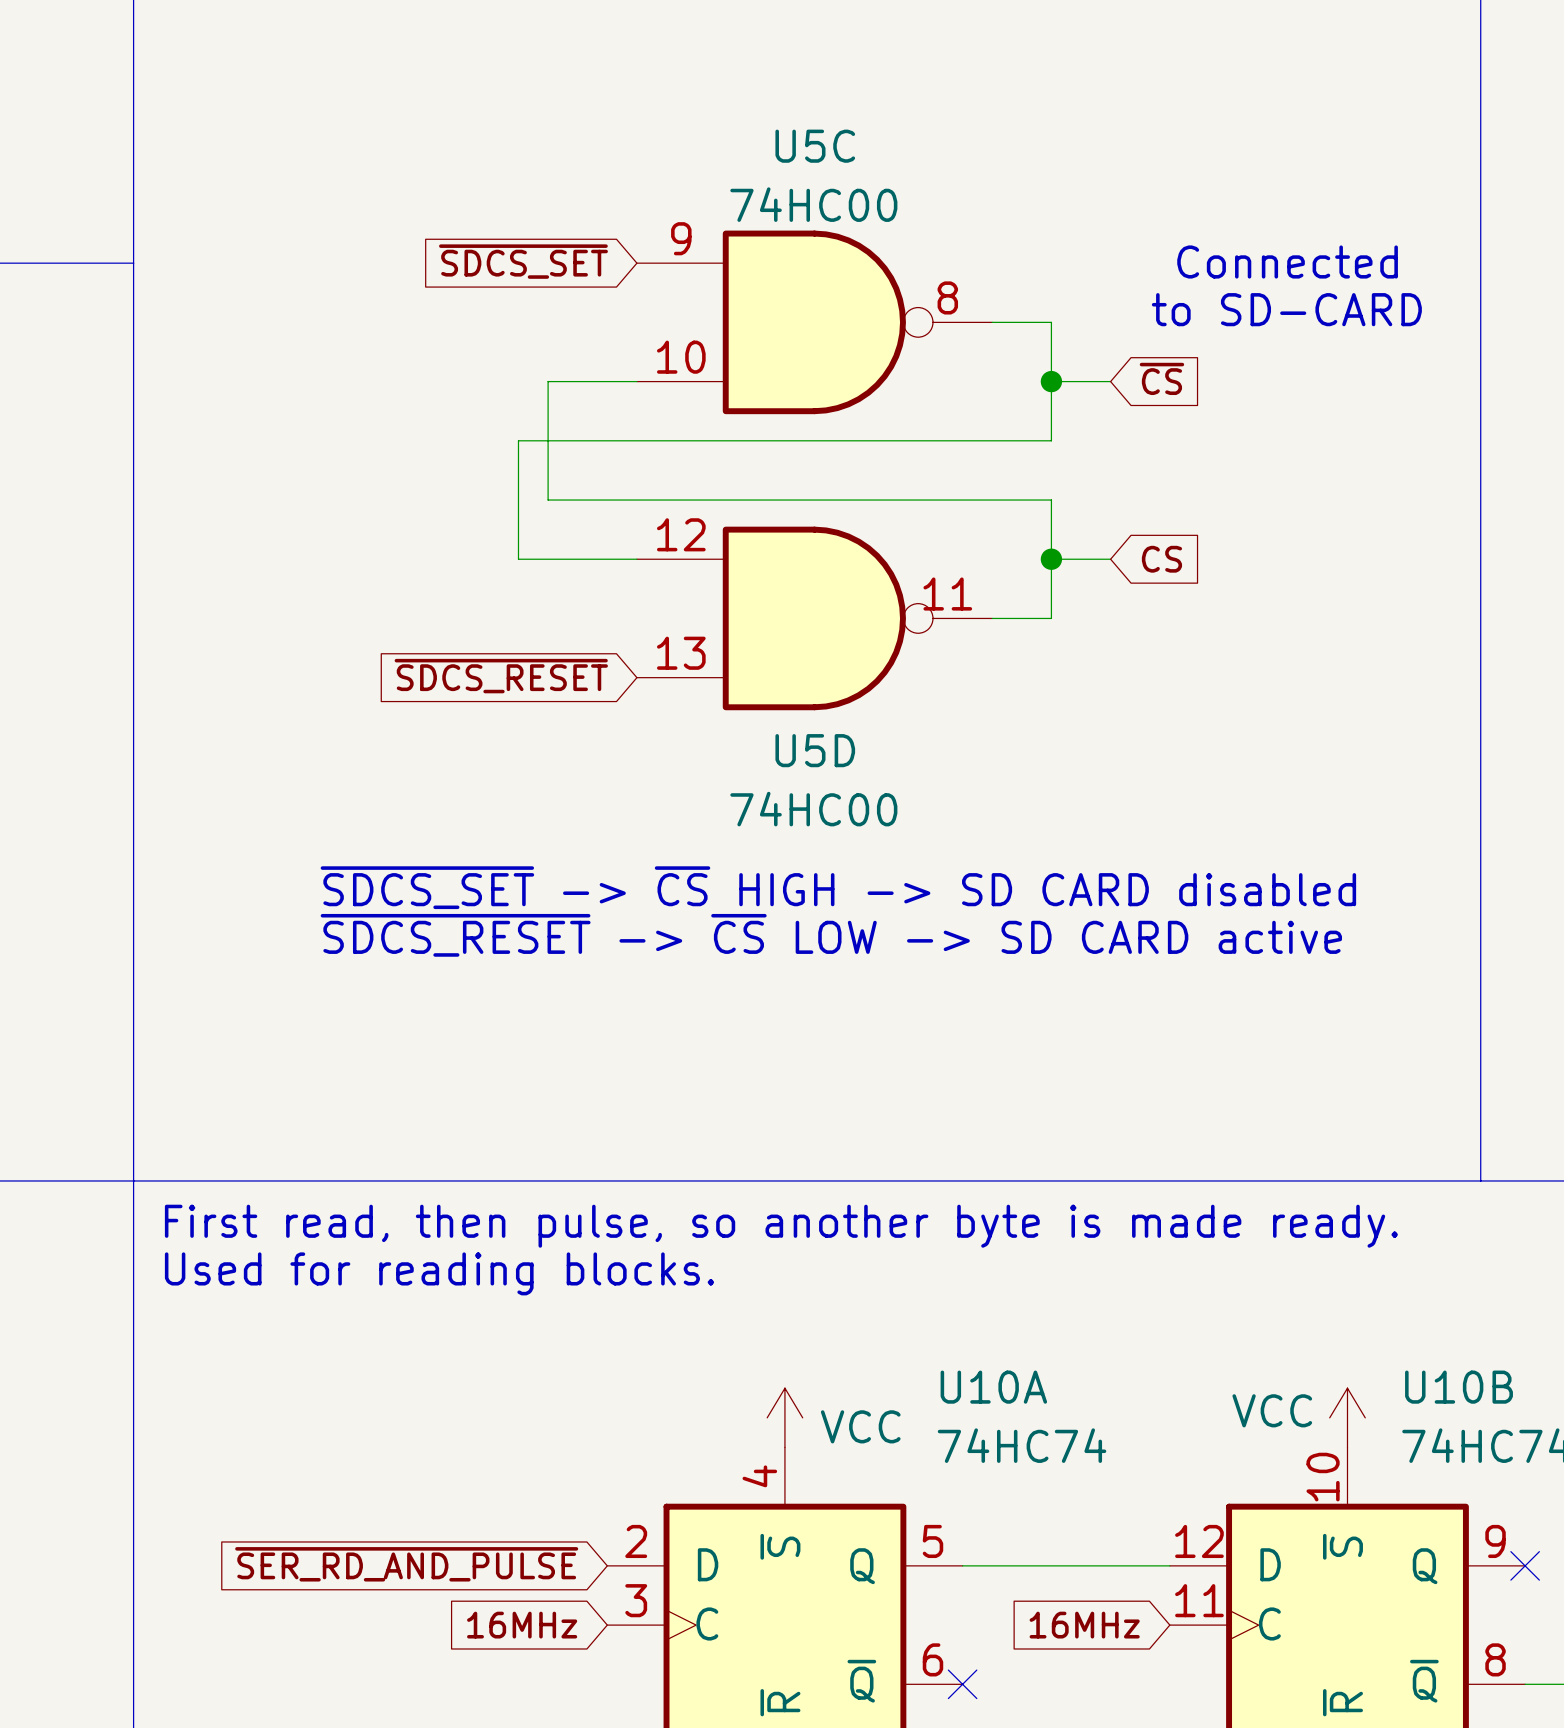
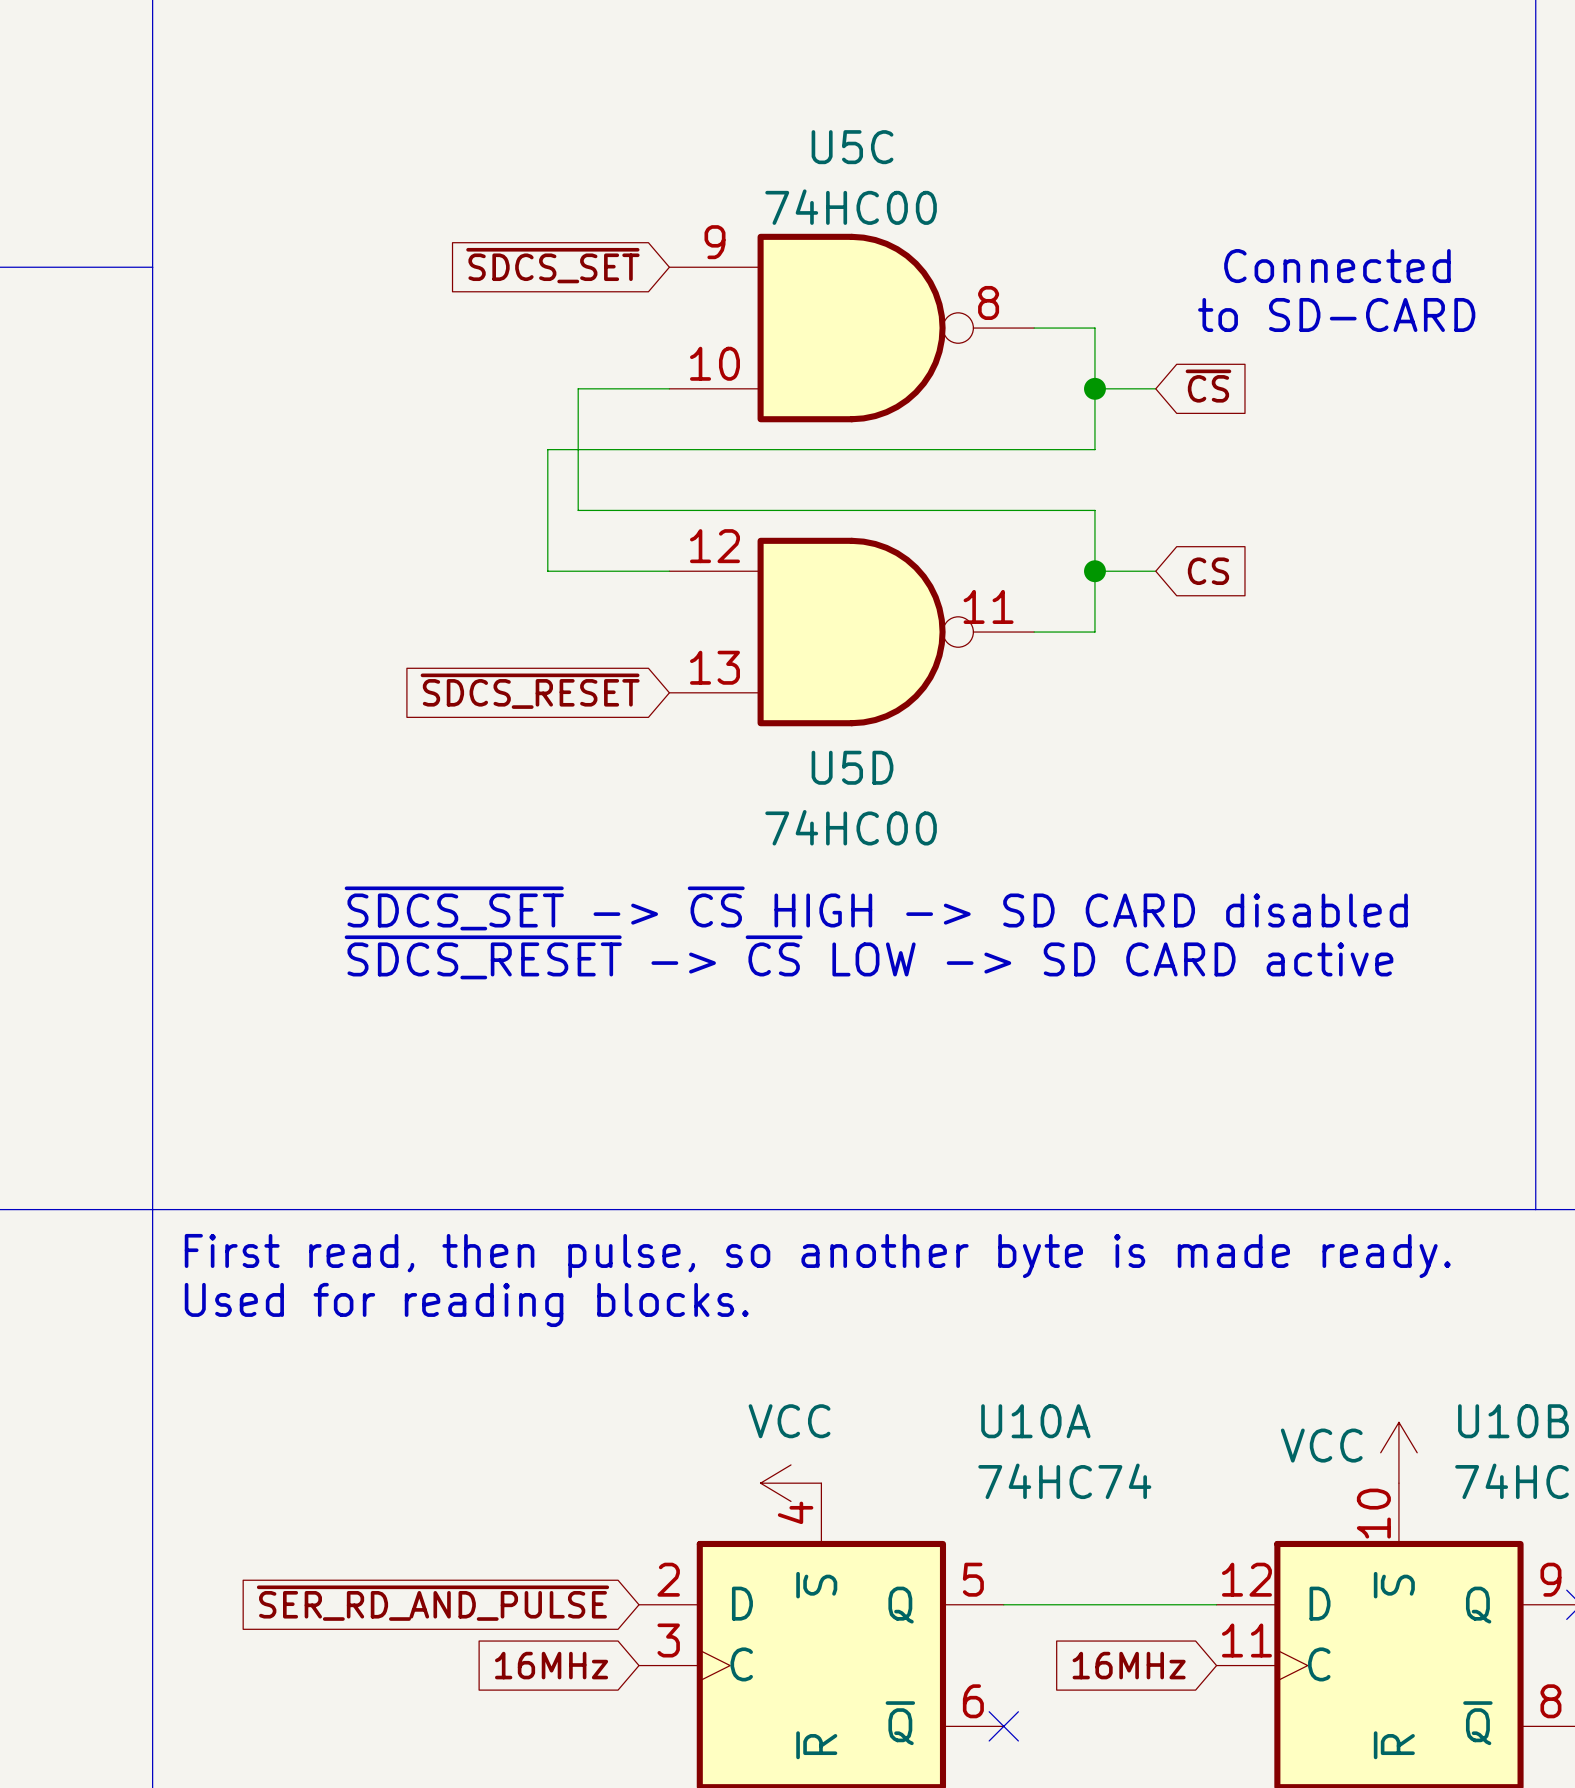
power symbol rotation: 0° (784, 1417) -> 90° counterclockwise (790, 1483)
power symbol position: VCC (784, 1417) -> VCC (790, 1483)

